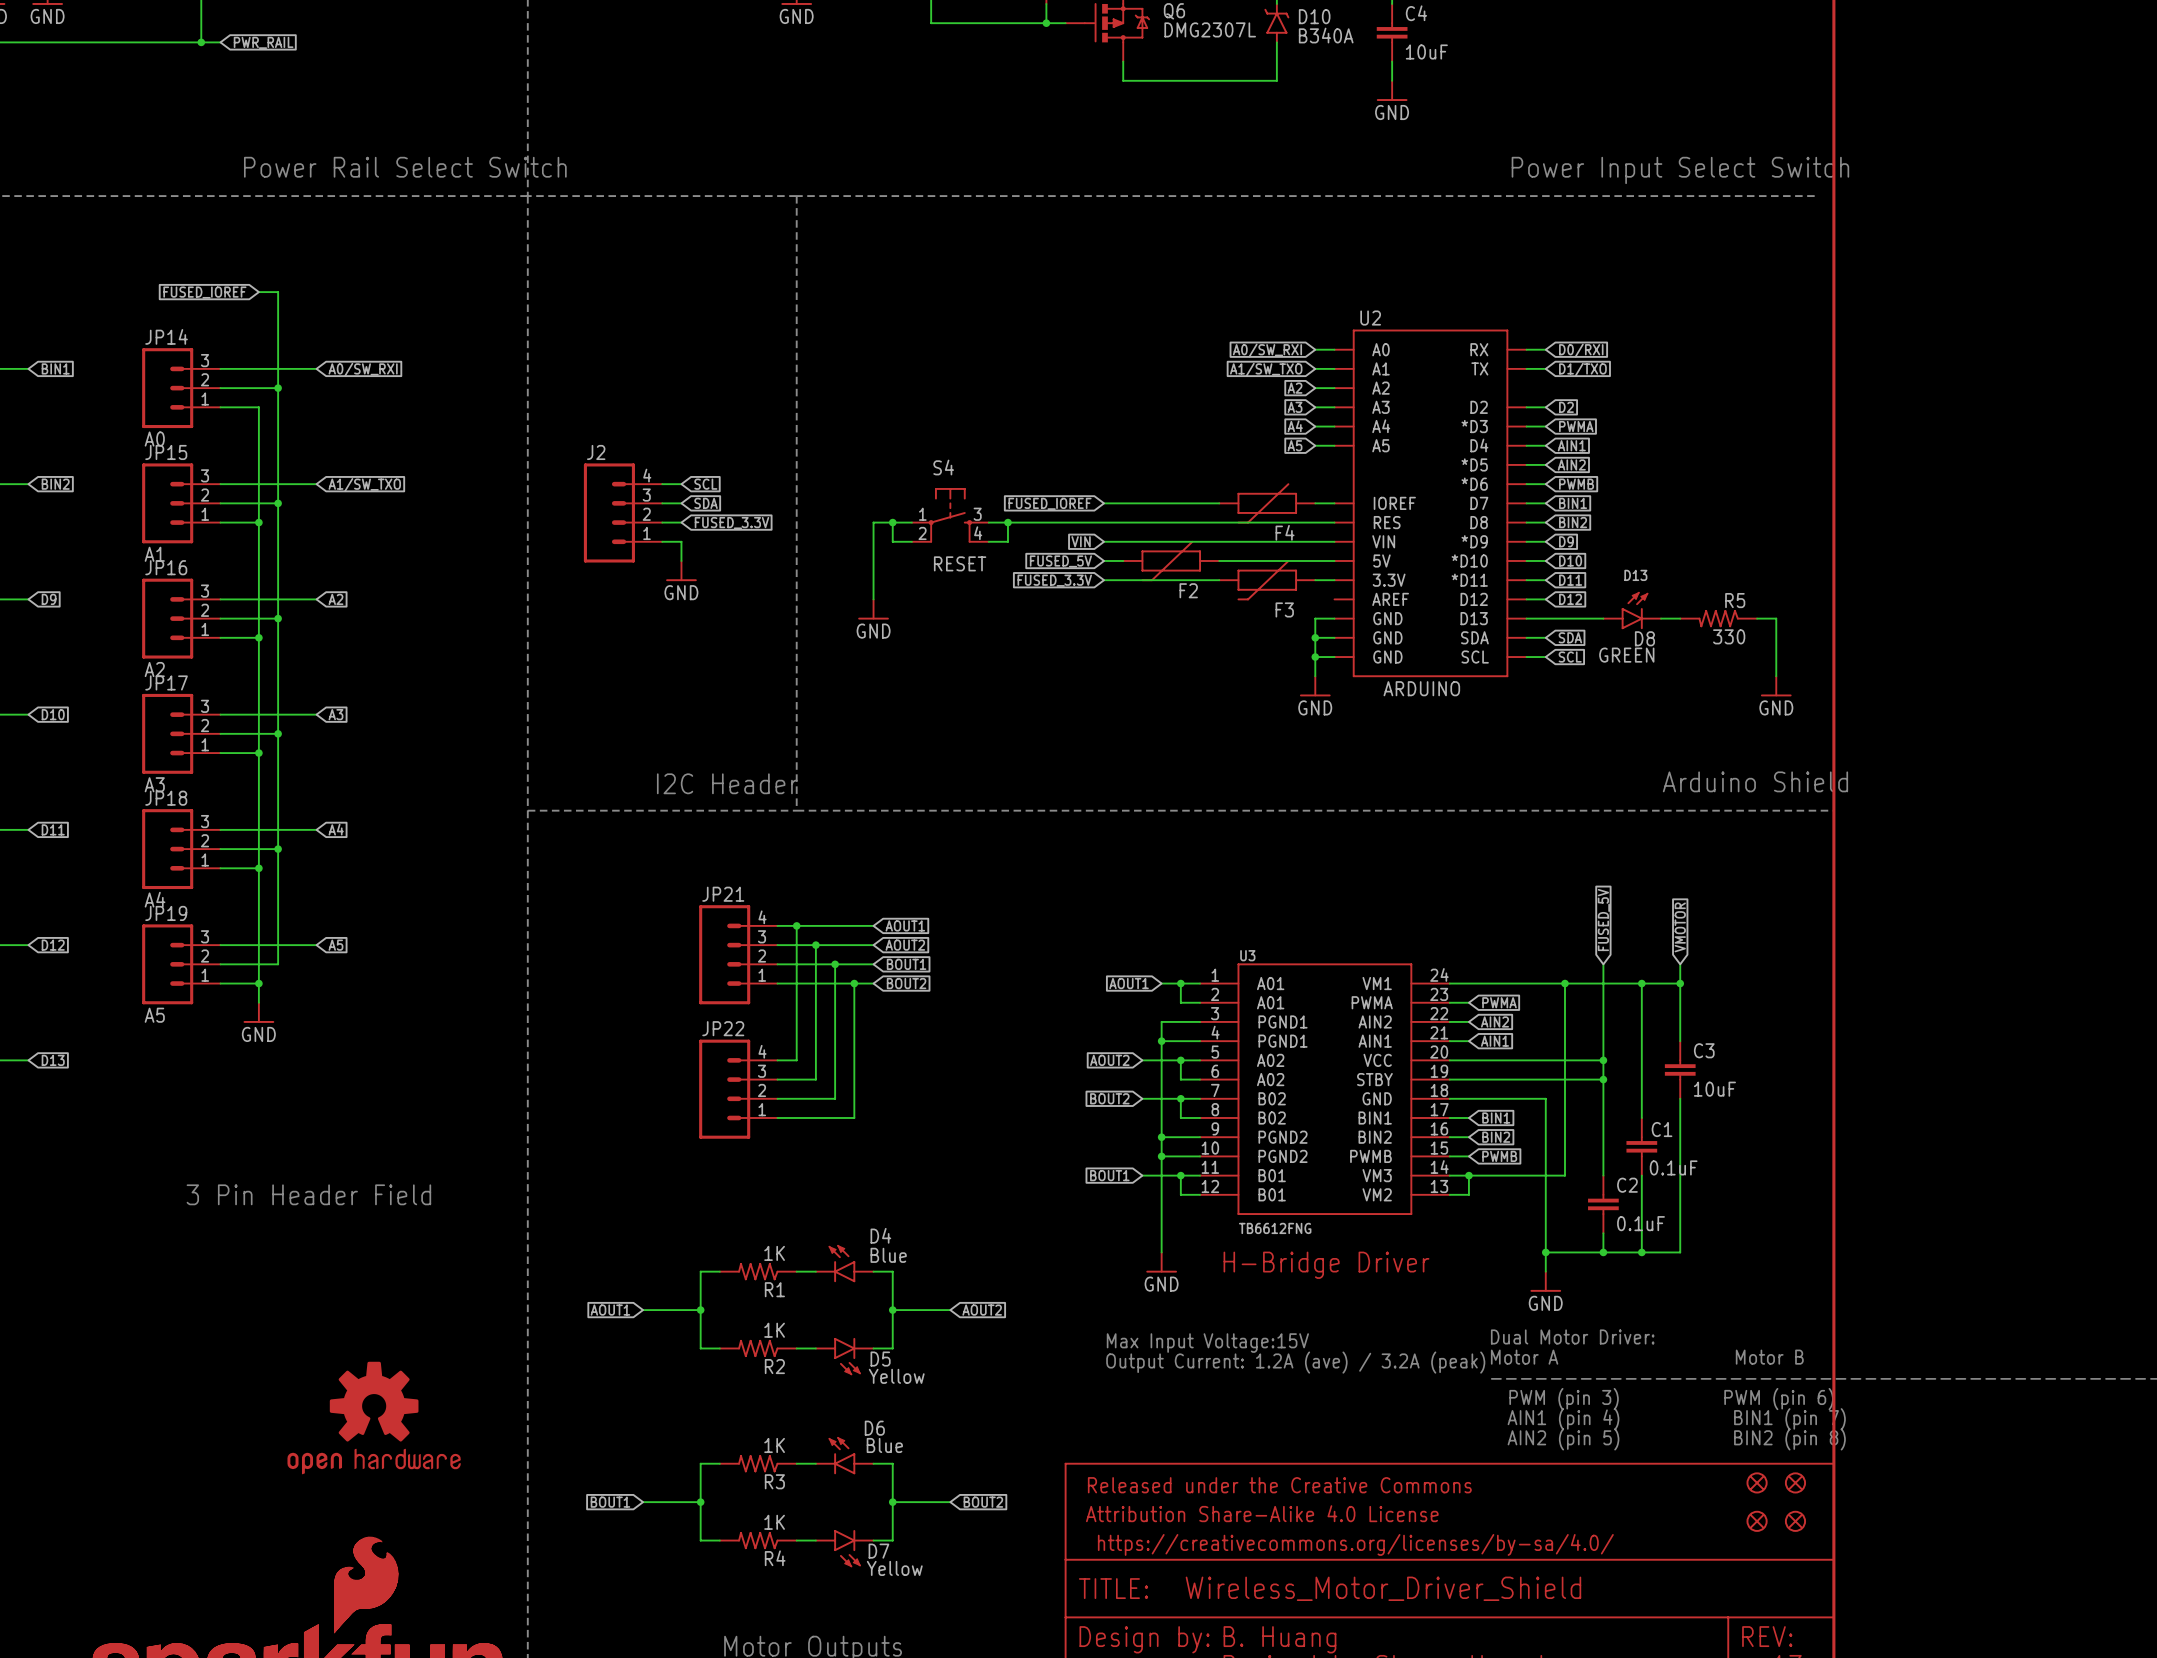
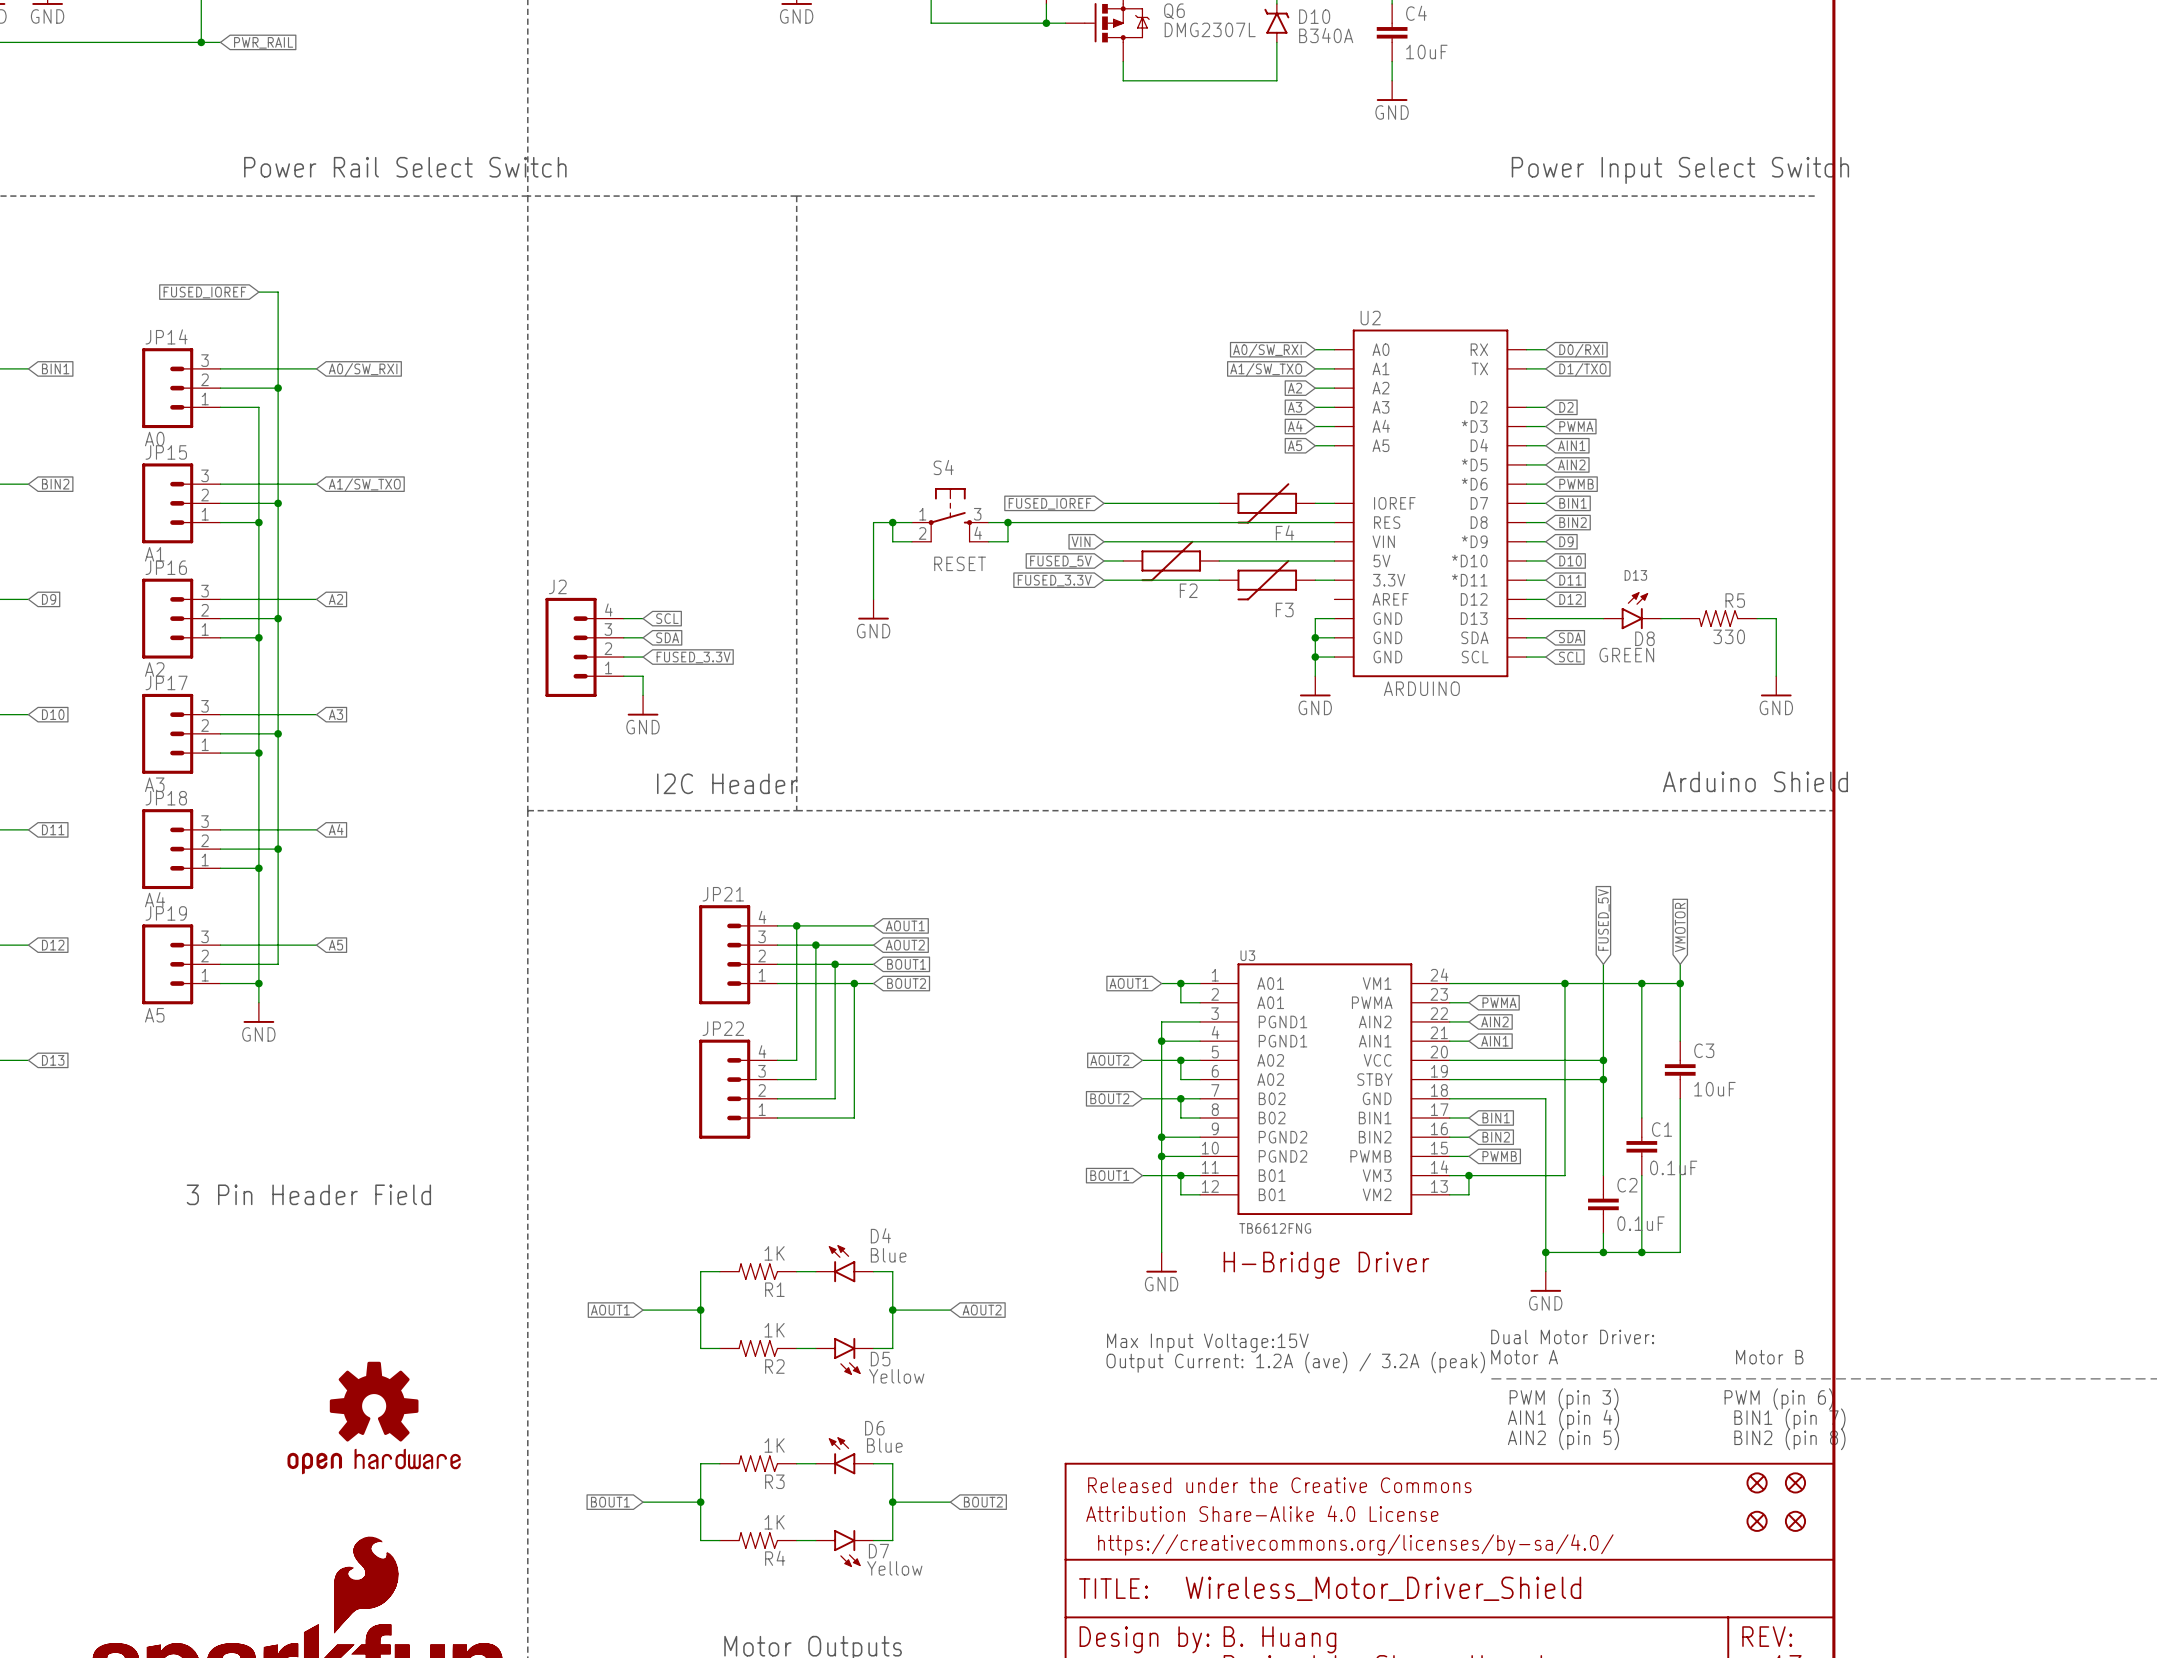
wire: (662, 484) (681, 484) -> (623, 657) (643, 657)
global label position: SCL (705, 484) -> SCL (667, 618)
wire: (662, 503) (681, 503) -> (623, 637) (643, 637)
global label position: SDA (706, 503) -> SDA (667, 637)
J2 position: (623, 512) -> (584, 647)
wire: (662, 522) (681, 522) -> (623, 618) (643, 618)
global label position: FUSED_3.3V (731, 523) -> FUSED_3.3V (693, 657)
wire: (662, 541) (681, 541) (681, 560) -> (623, 676) (643, 676) (643, 695)
power symbol position: GND (681, 571) -> GND (643, 705)

